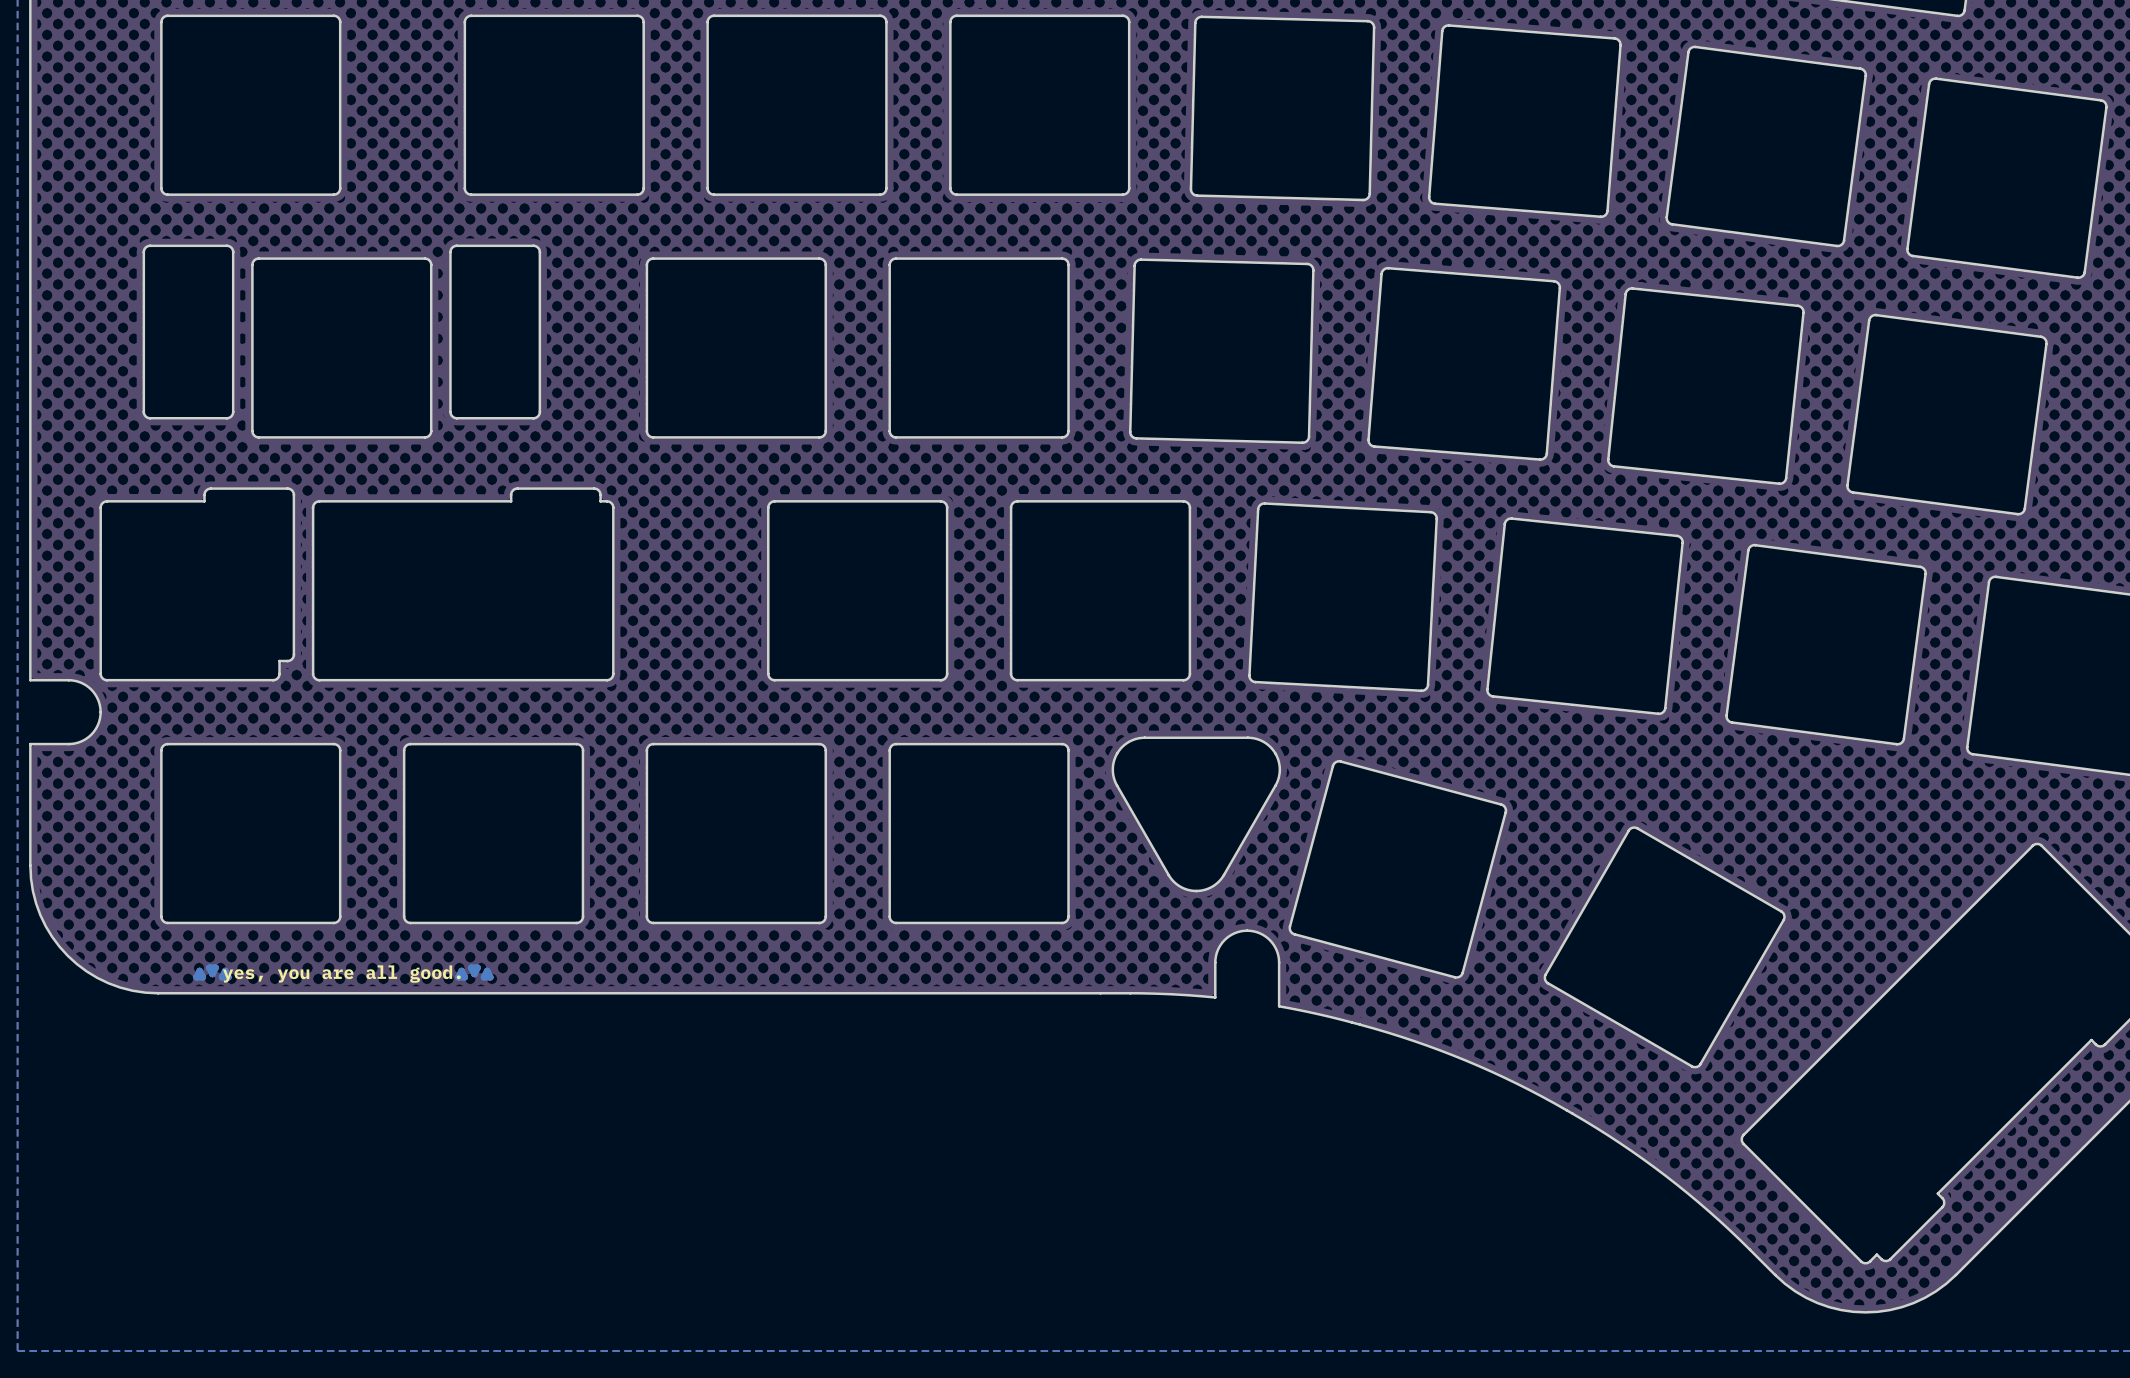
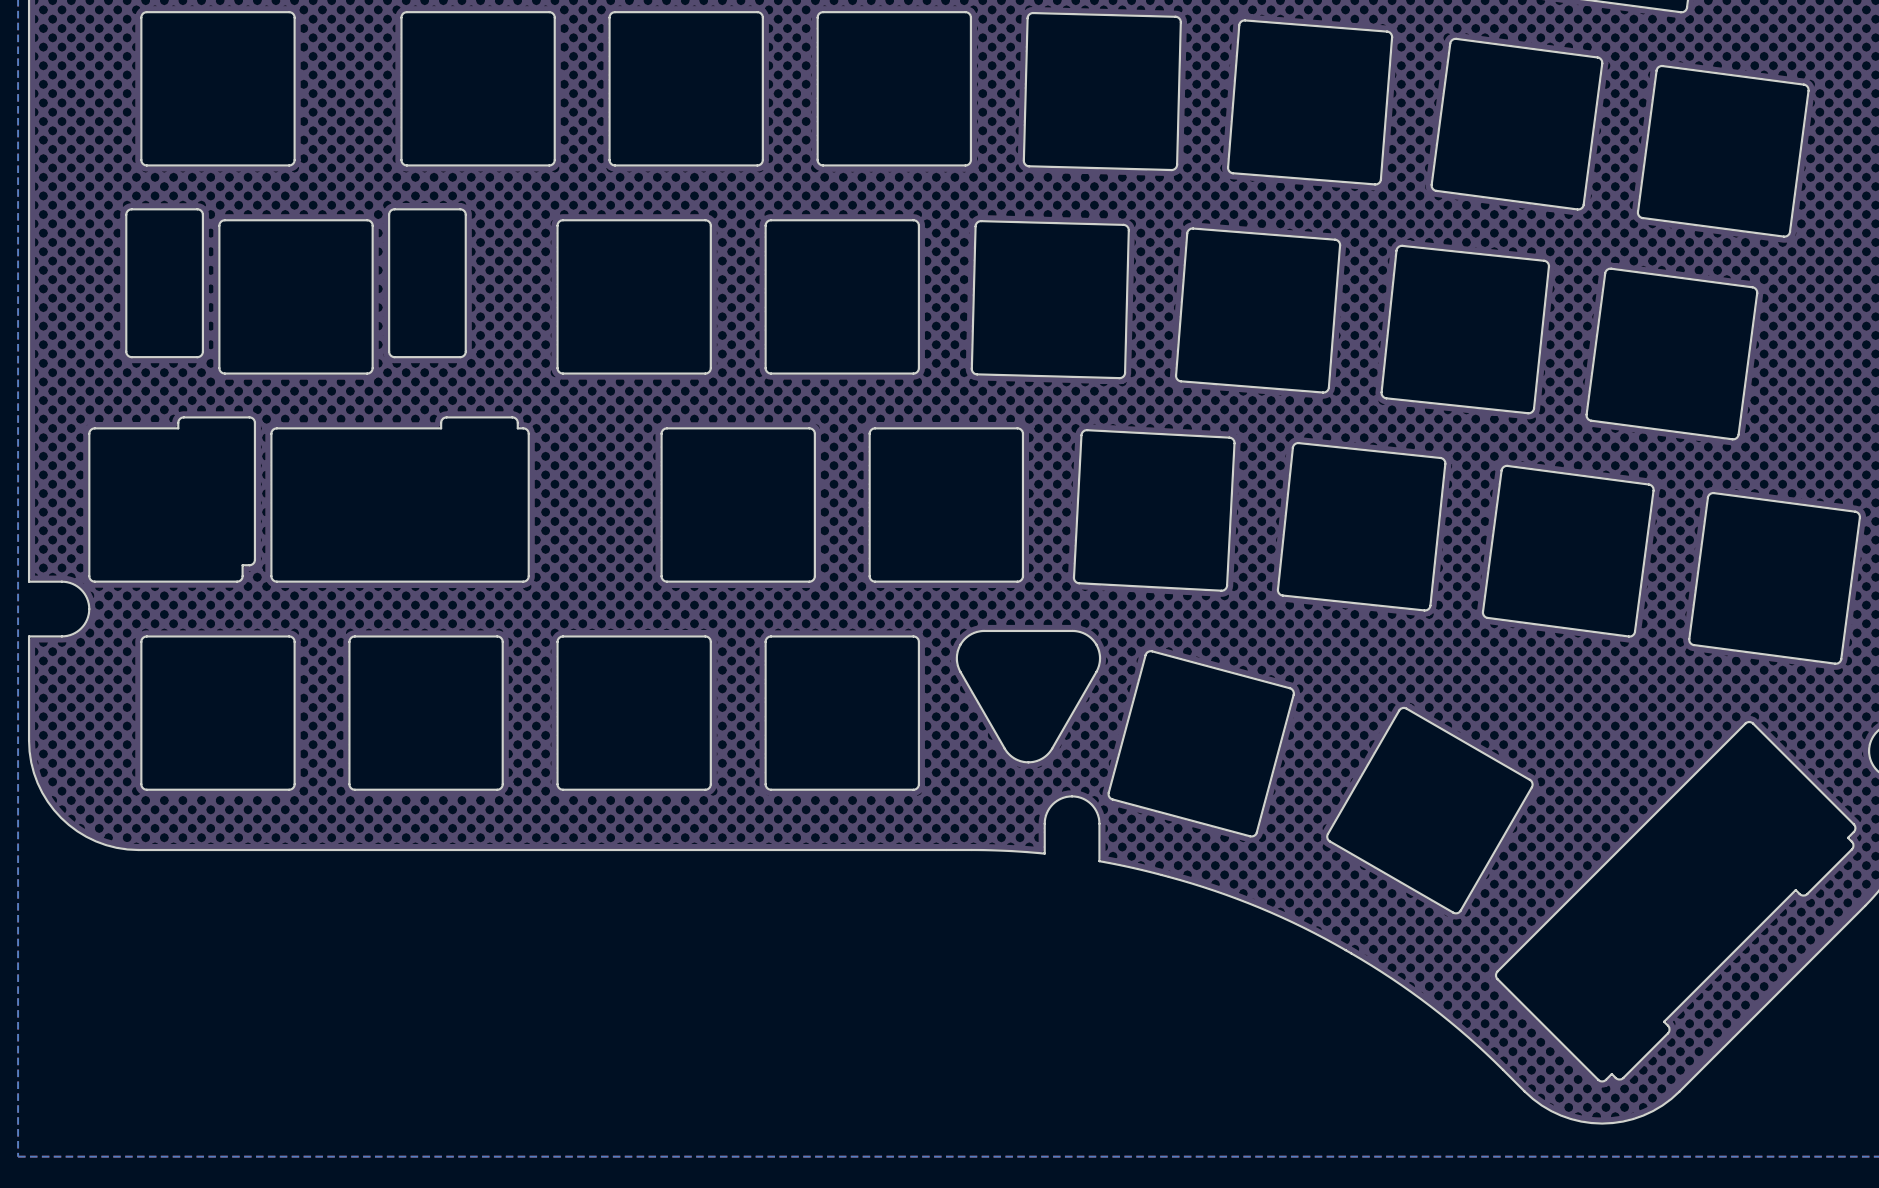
bottom track: (215, 967) (209, 967) (212, 974) (215, 967) -> none
bottom track: (477, 967) (471, 967) (474, 974) (477, 967) -> none
bottom track: (199, 970) (202, 977) (196, 977) (199, 970) -> none
bottom track: (225, 970) (228, 977) (222, 977) (225, 970) -> none
bottom track: (461, 970) (464, 977) (458, 977) (461, 970) -> none
bottom track: (487, 970) (490, 977) (483, 977) (487, 970) -> none
text: yes, you are all good. (341, 974) -> none

